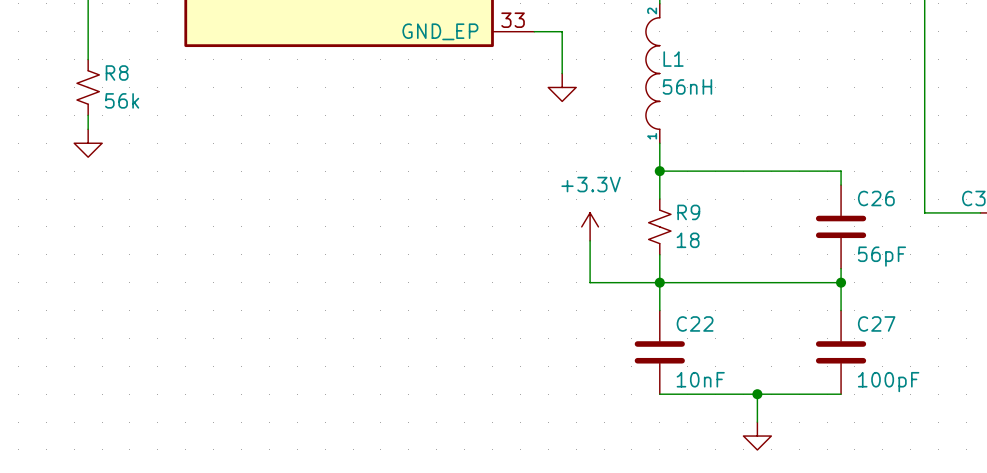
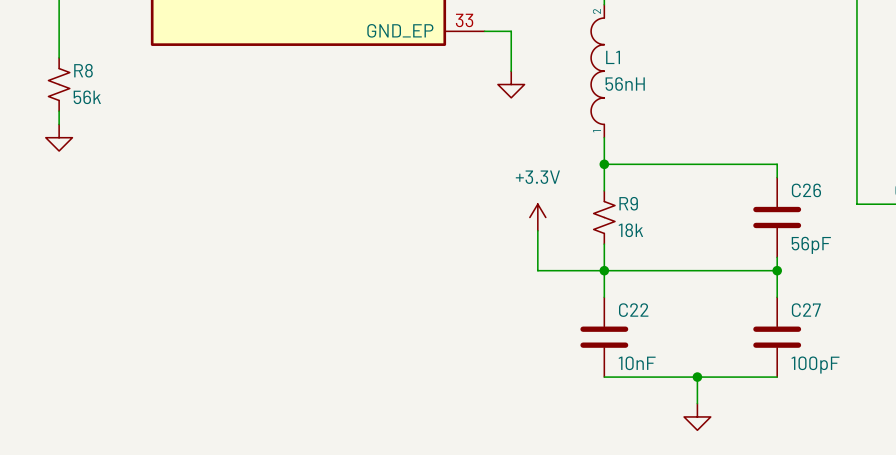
R9 value: 18 (688, 240) -> 18k (630, 230)

